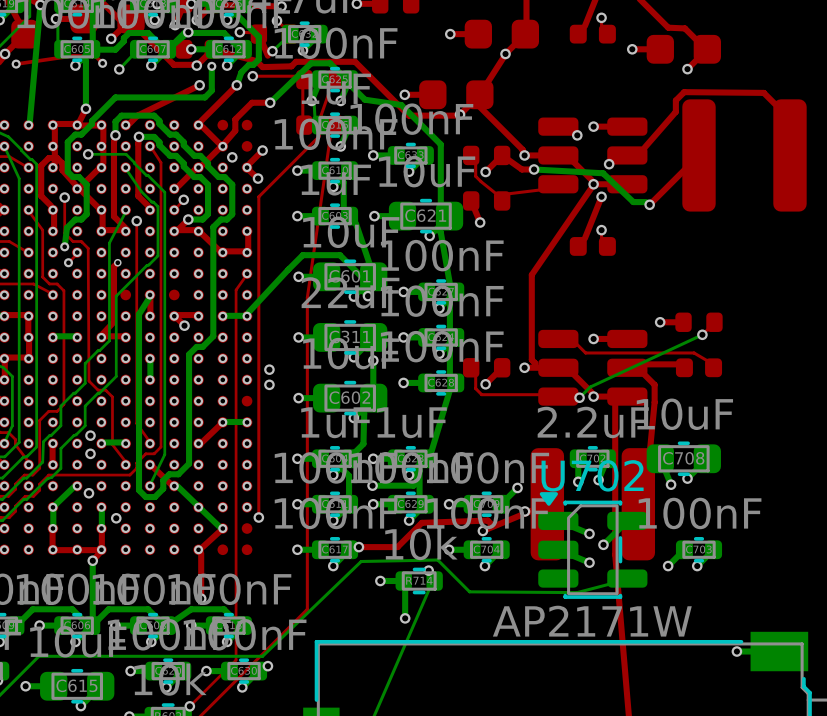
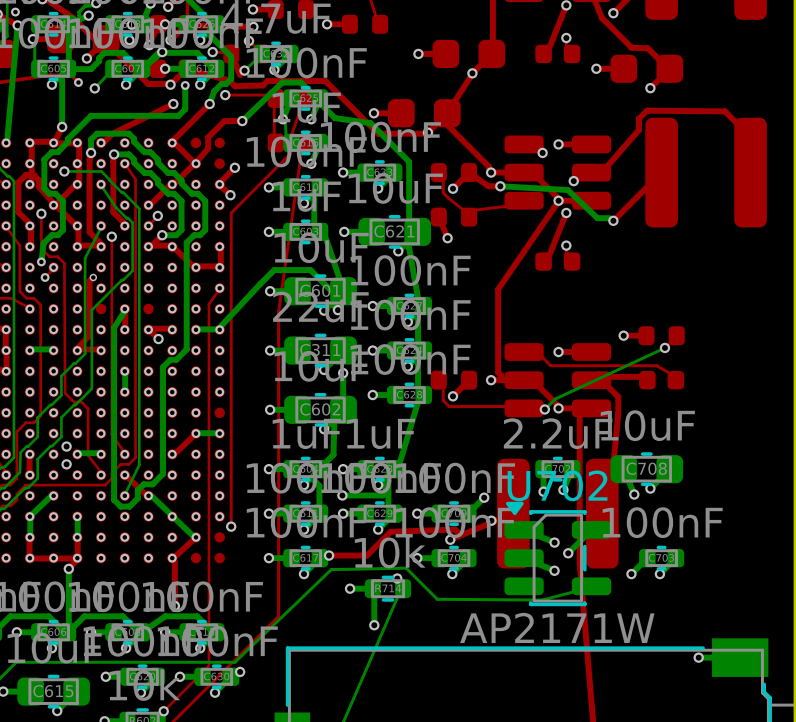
via: (232, 157) -> none
via: (269, 369) -> none
via: (269, 384) -> none
via: (88, 493) -> none
via: (116, 518) -> none

